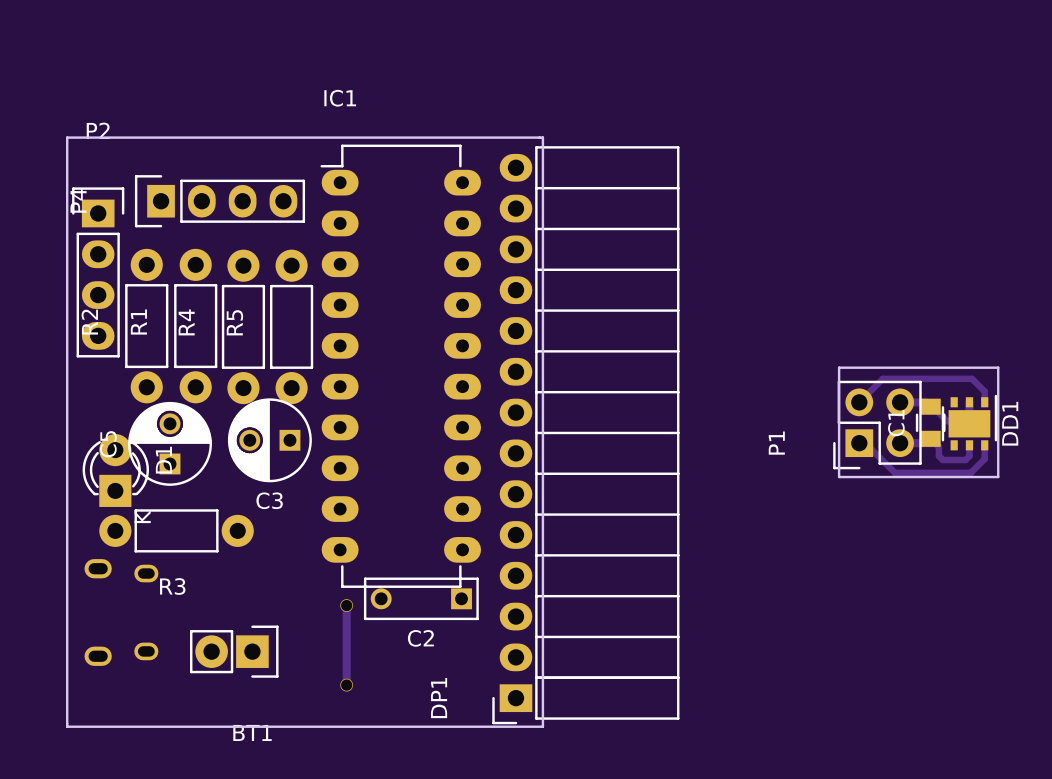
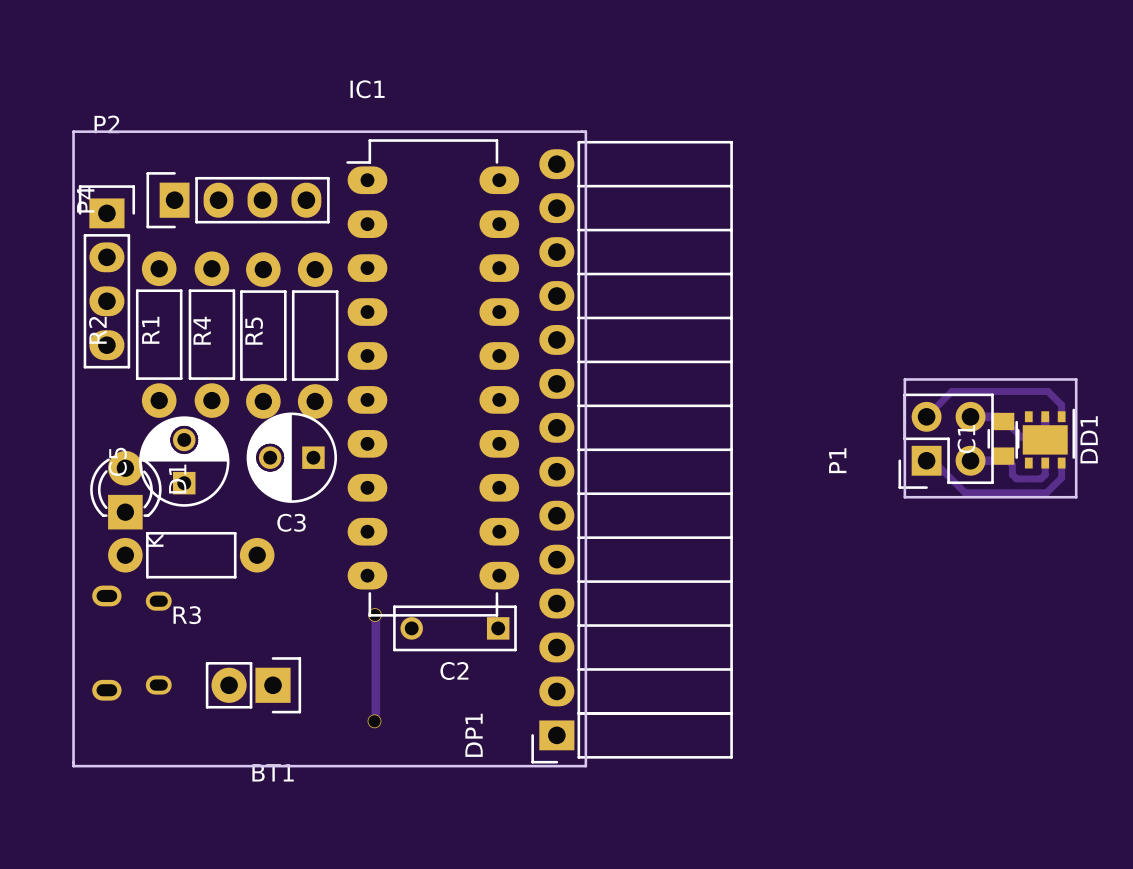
track: none -> (374, 614) (375, 713)
track: (346, 605) (346, 685) -> none
via position: (346, 605) -> (374, 614)

